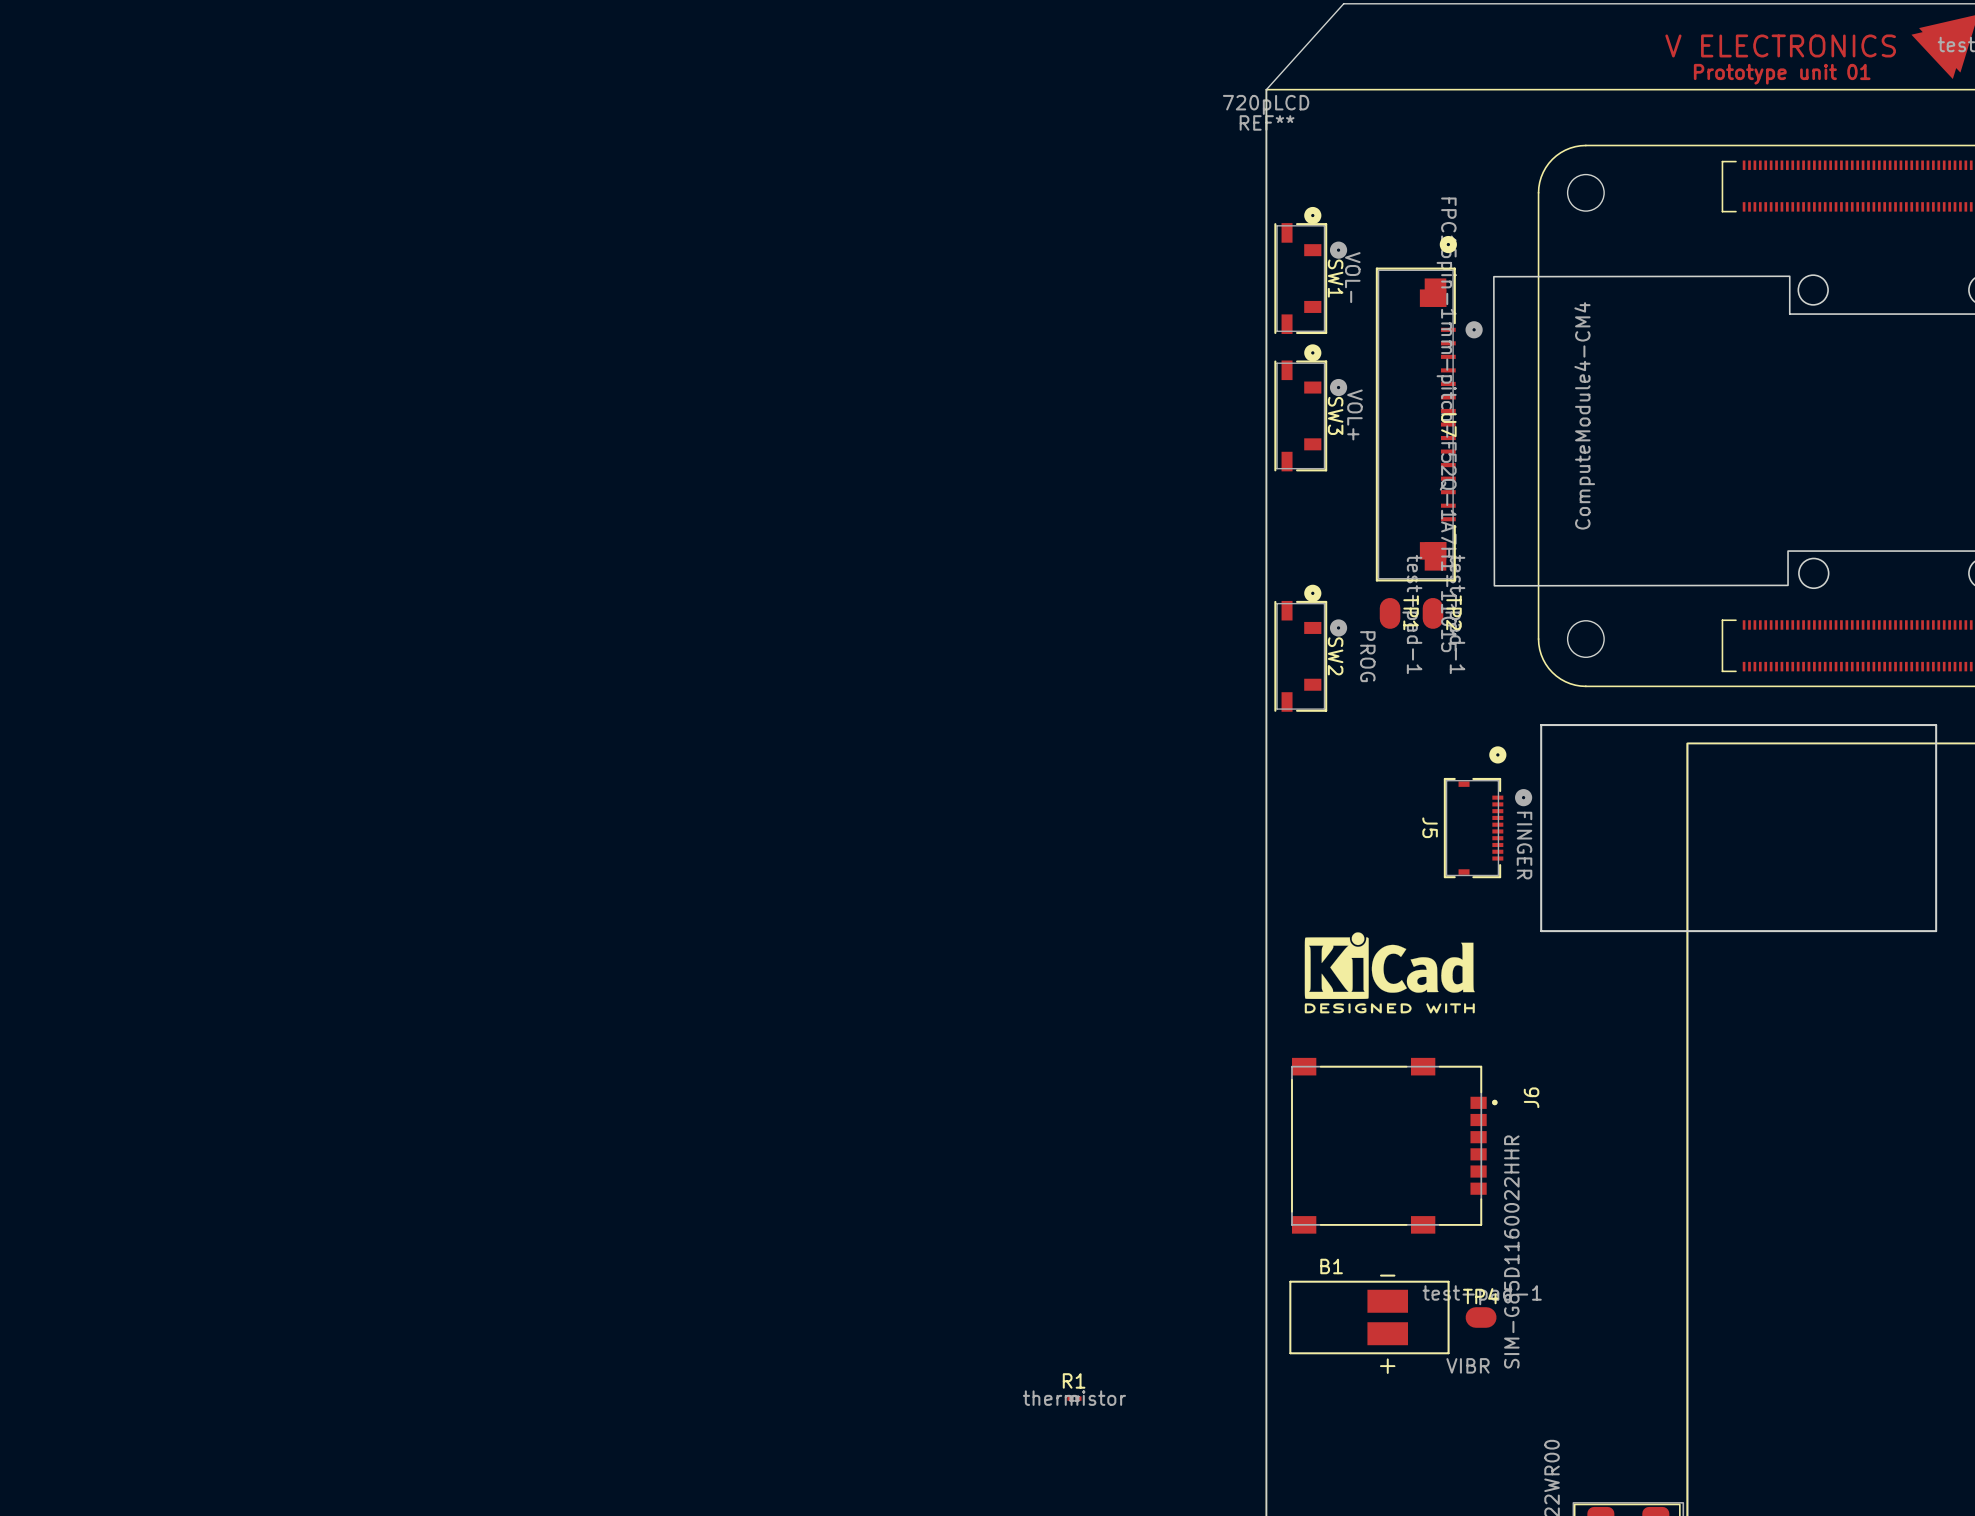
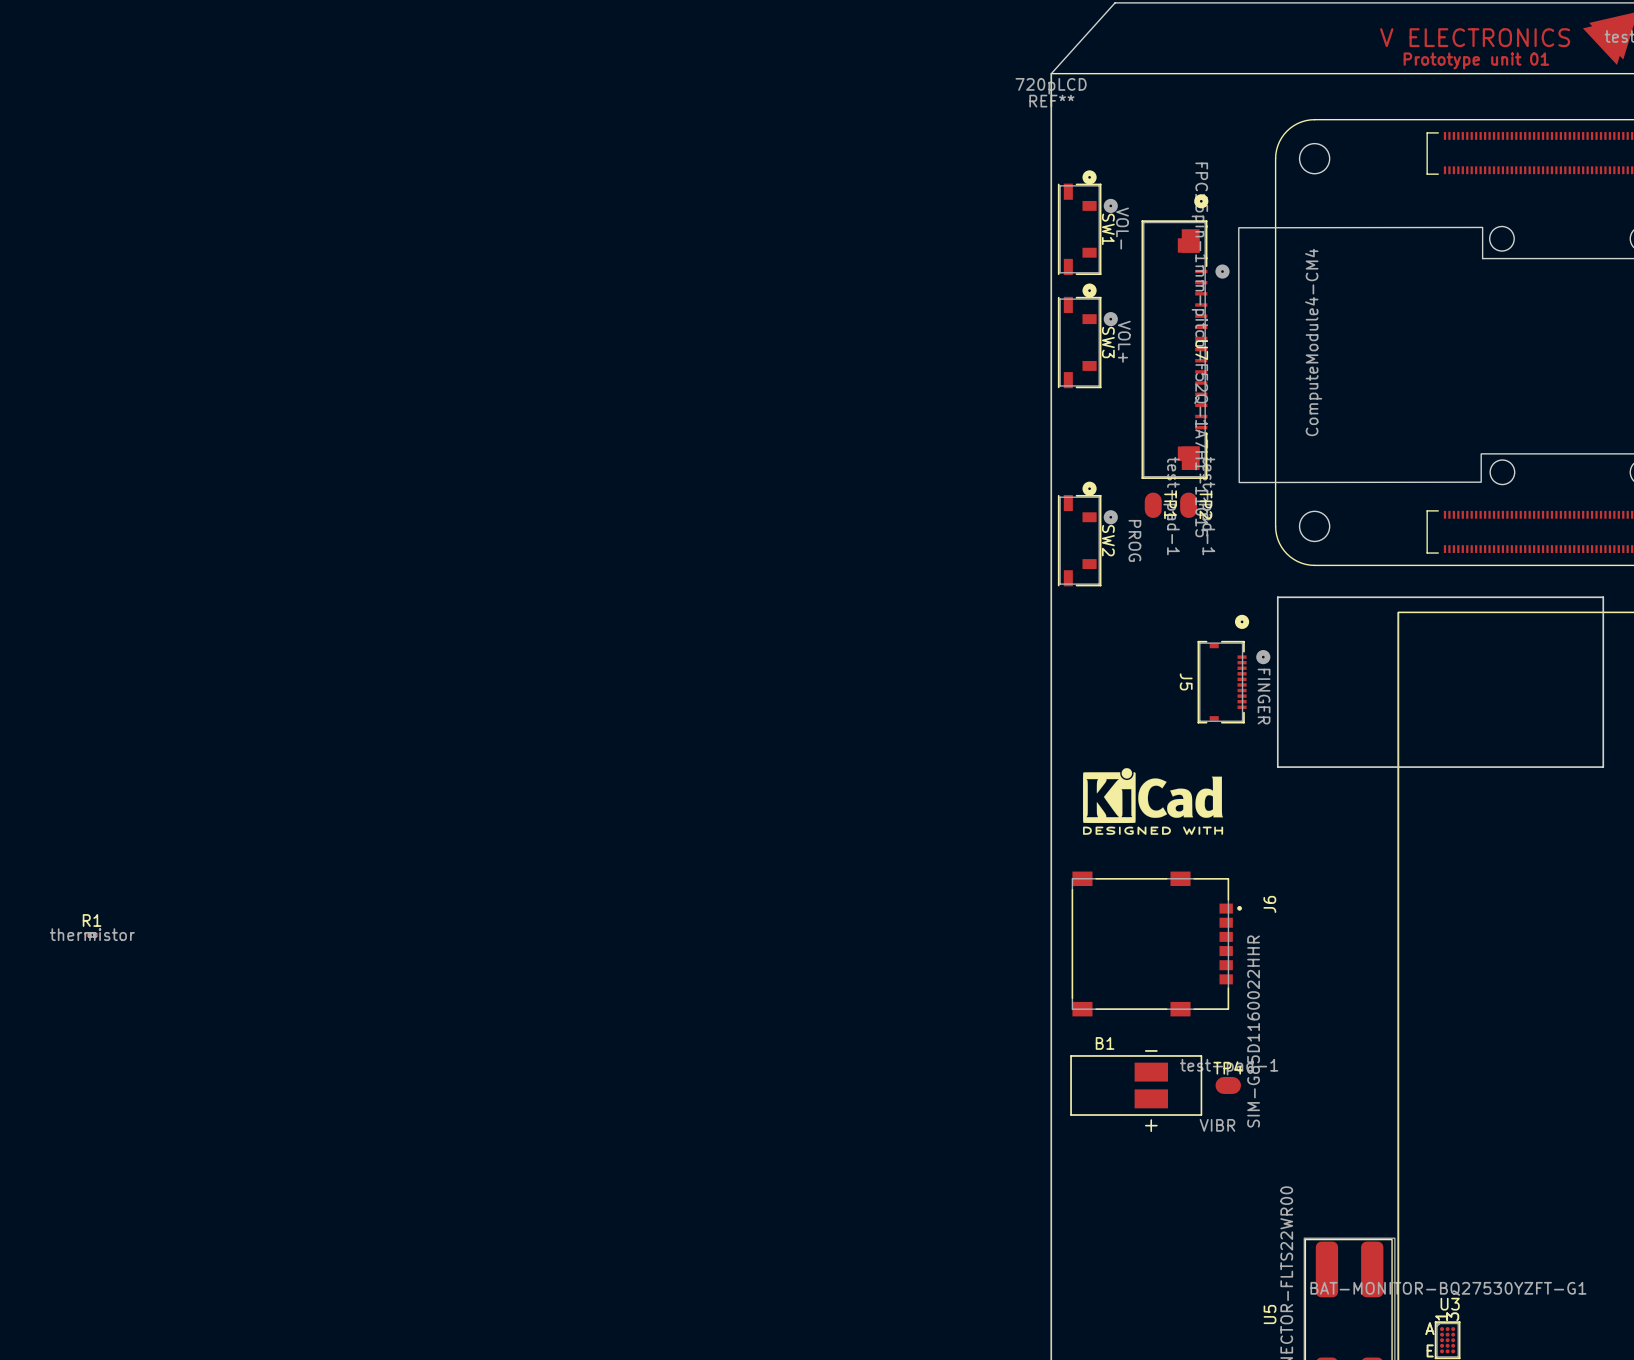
R1 position: (1074, 1398) -> (92, 935)

